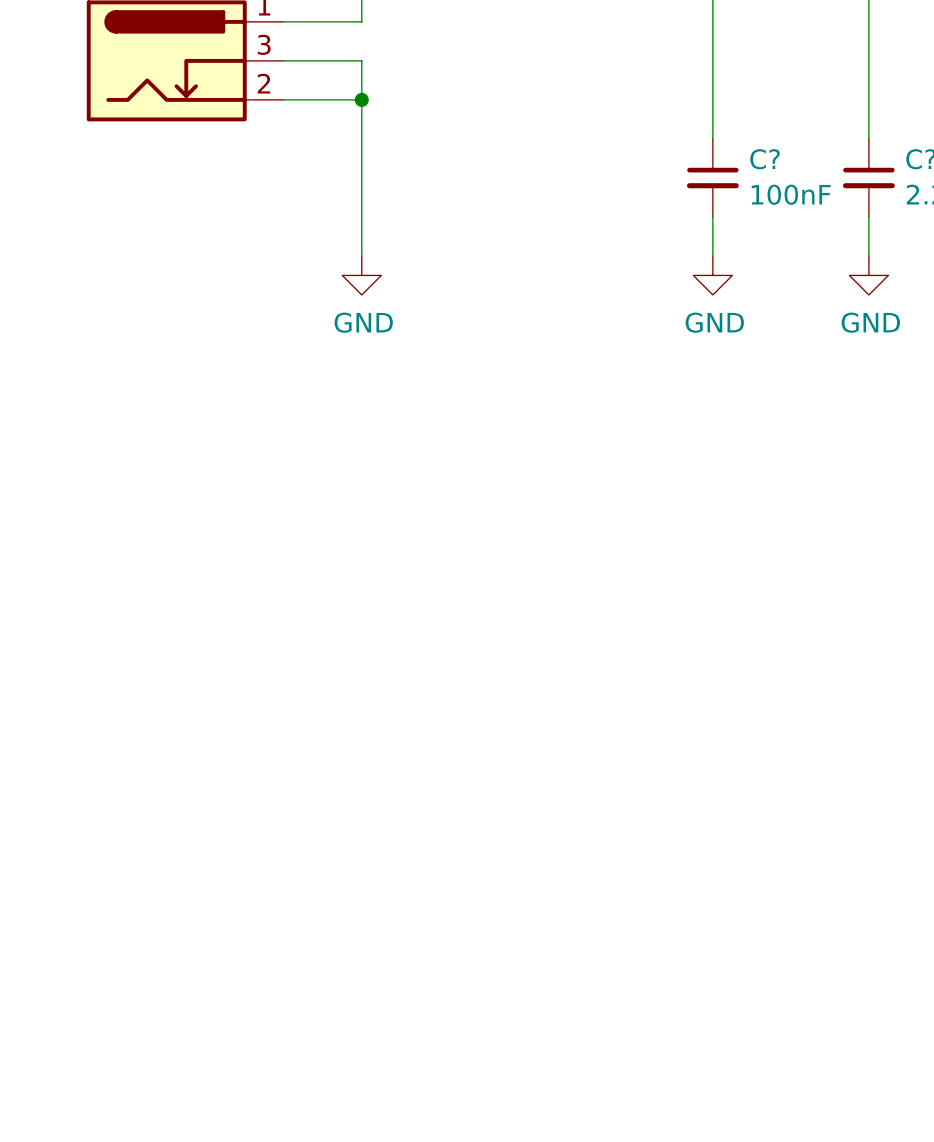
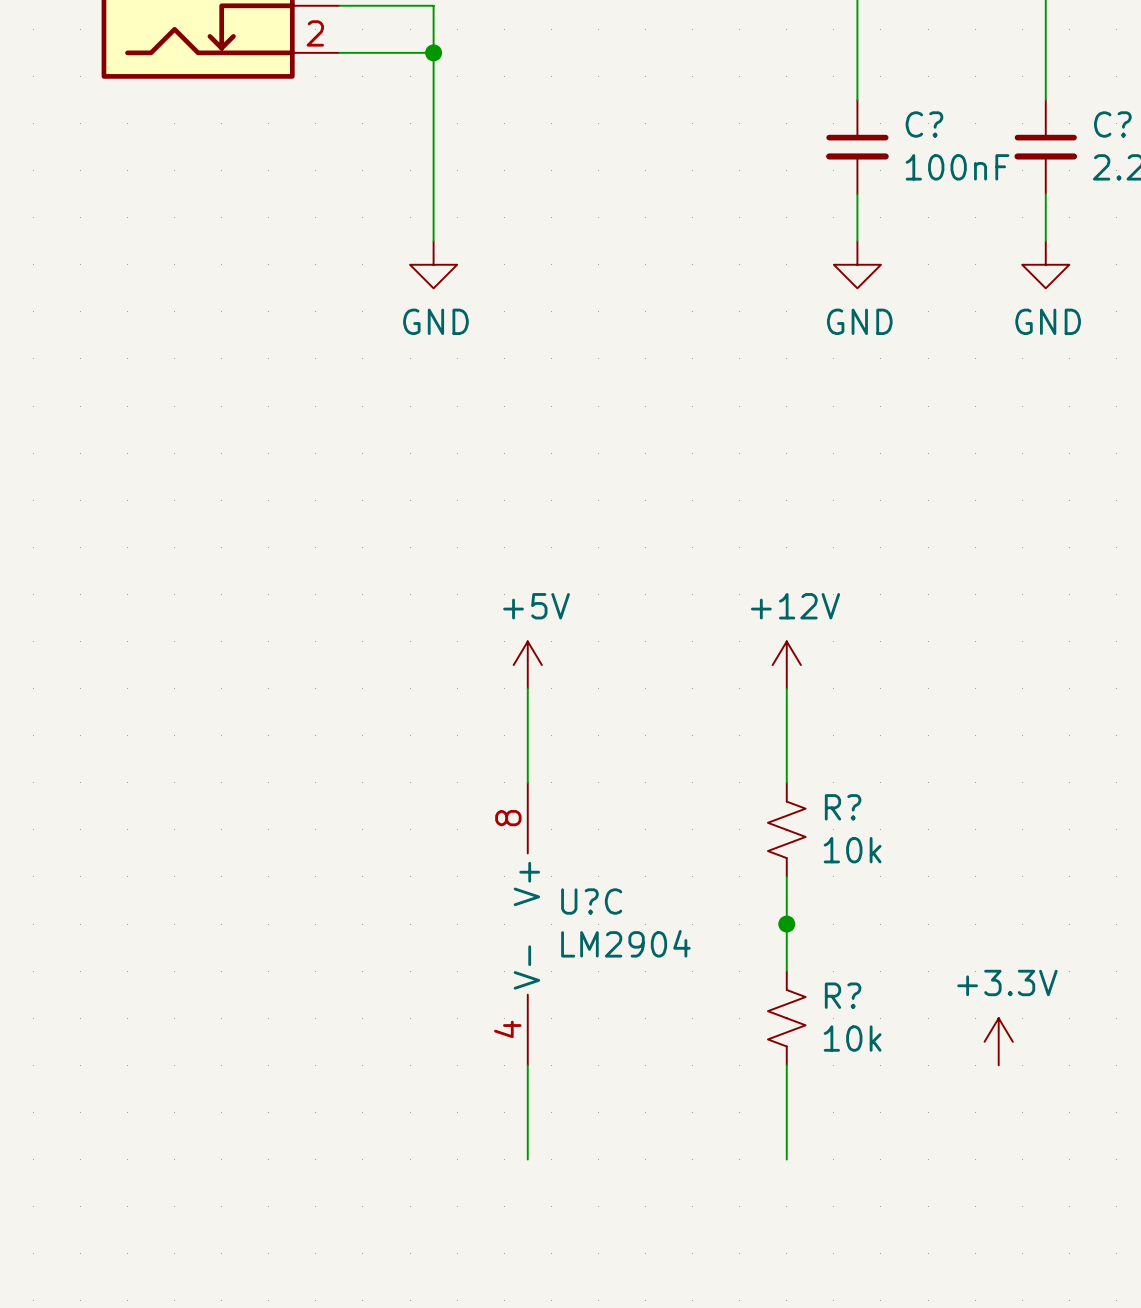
power symbol: none -> +5V (527, 665)
power symbol: none -> +12V (786, 665)
wire: none -> (527, 688) (527, 782)
wire: none -> (786, 688) (786, 782)
R?: none -> 10k (786, 829)
wire: none -> (786, 876) (786, 971)
U?C: none -> LM2904 (527, 924)
junction: none -> (786, 924)
R?: none -> 10k (786, 1018)
power symbol: none -> +3.3V (998, 1041)
wire: none -> (527, 1065) (527, 1159)
wire: none -> (786, 1065) (786, 1159)

